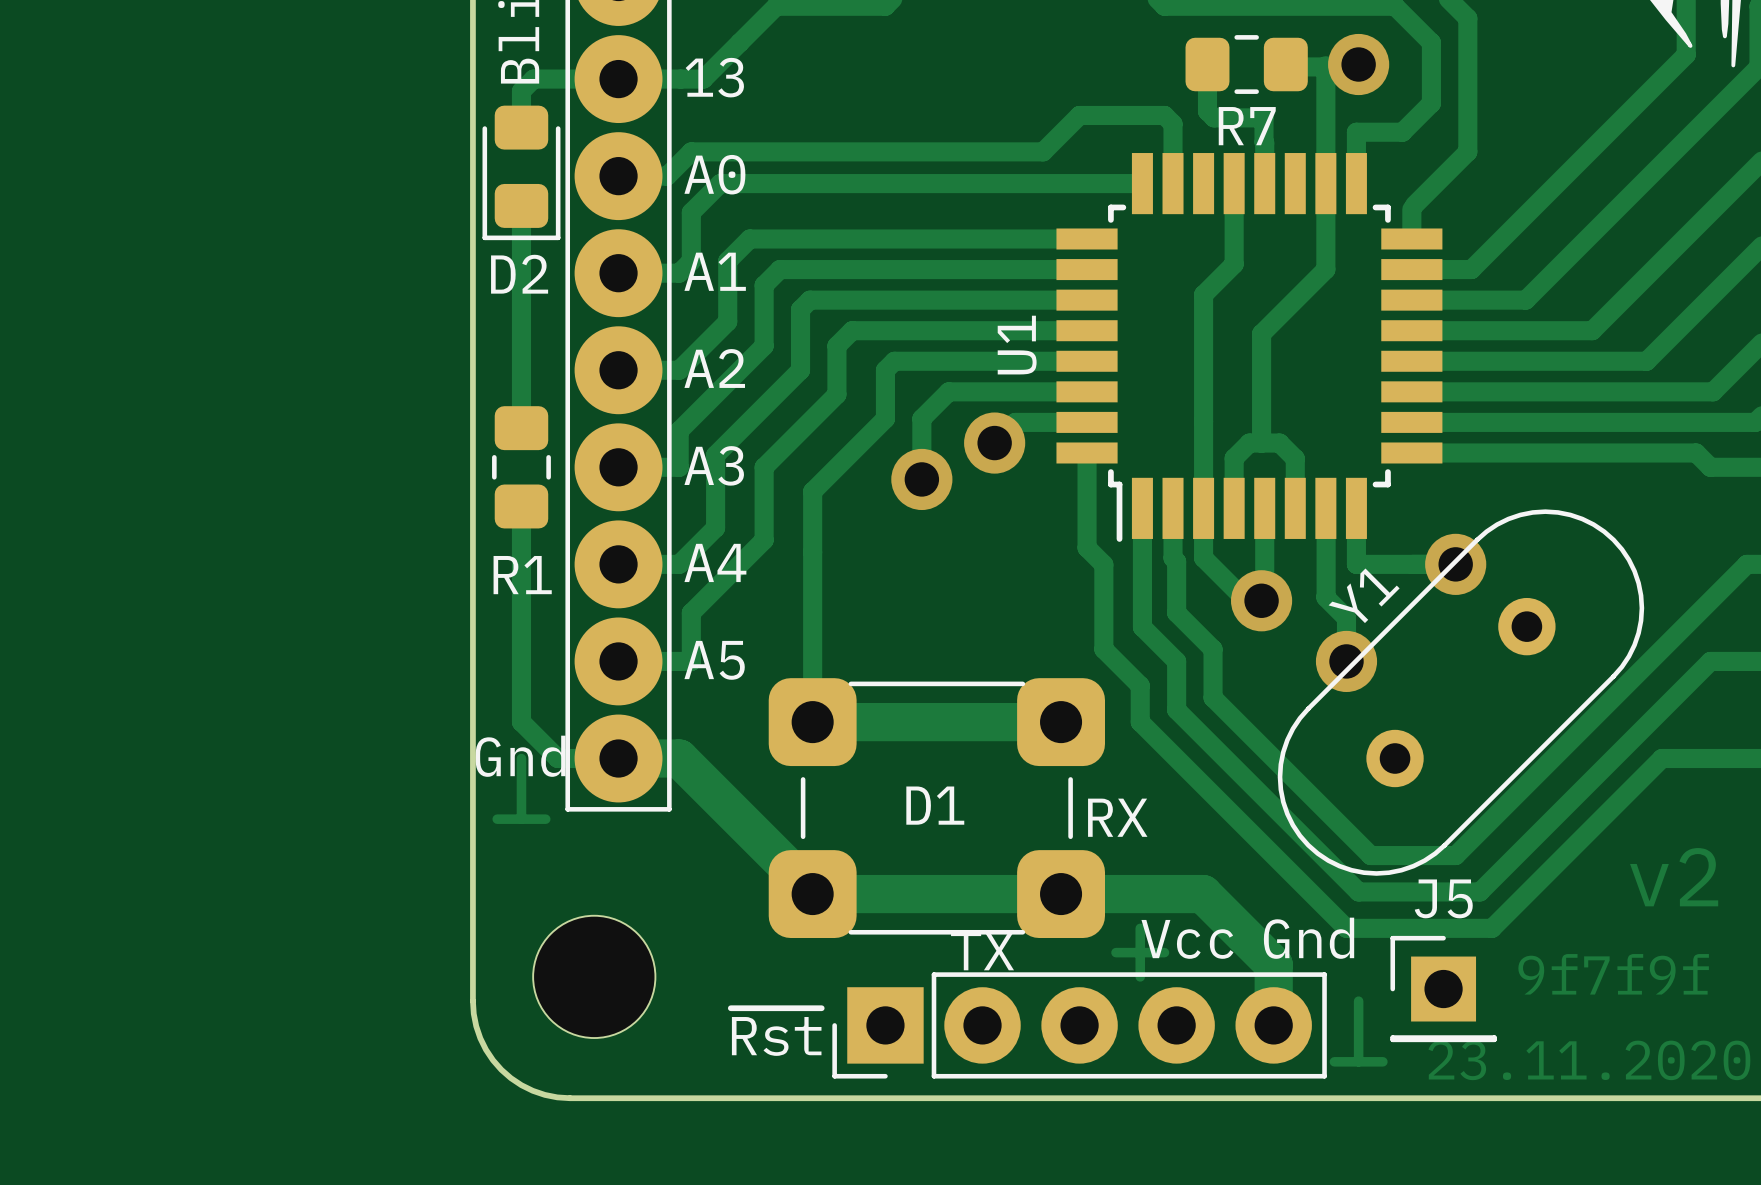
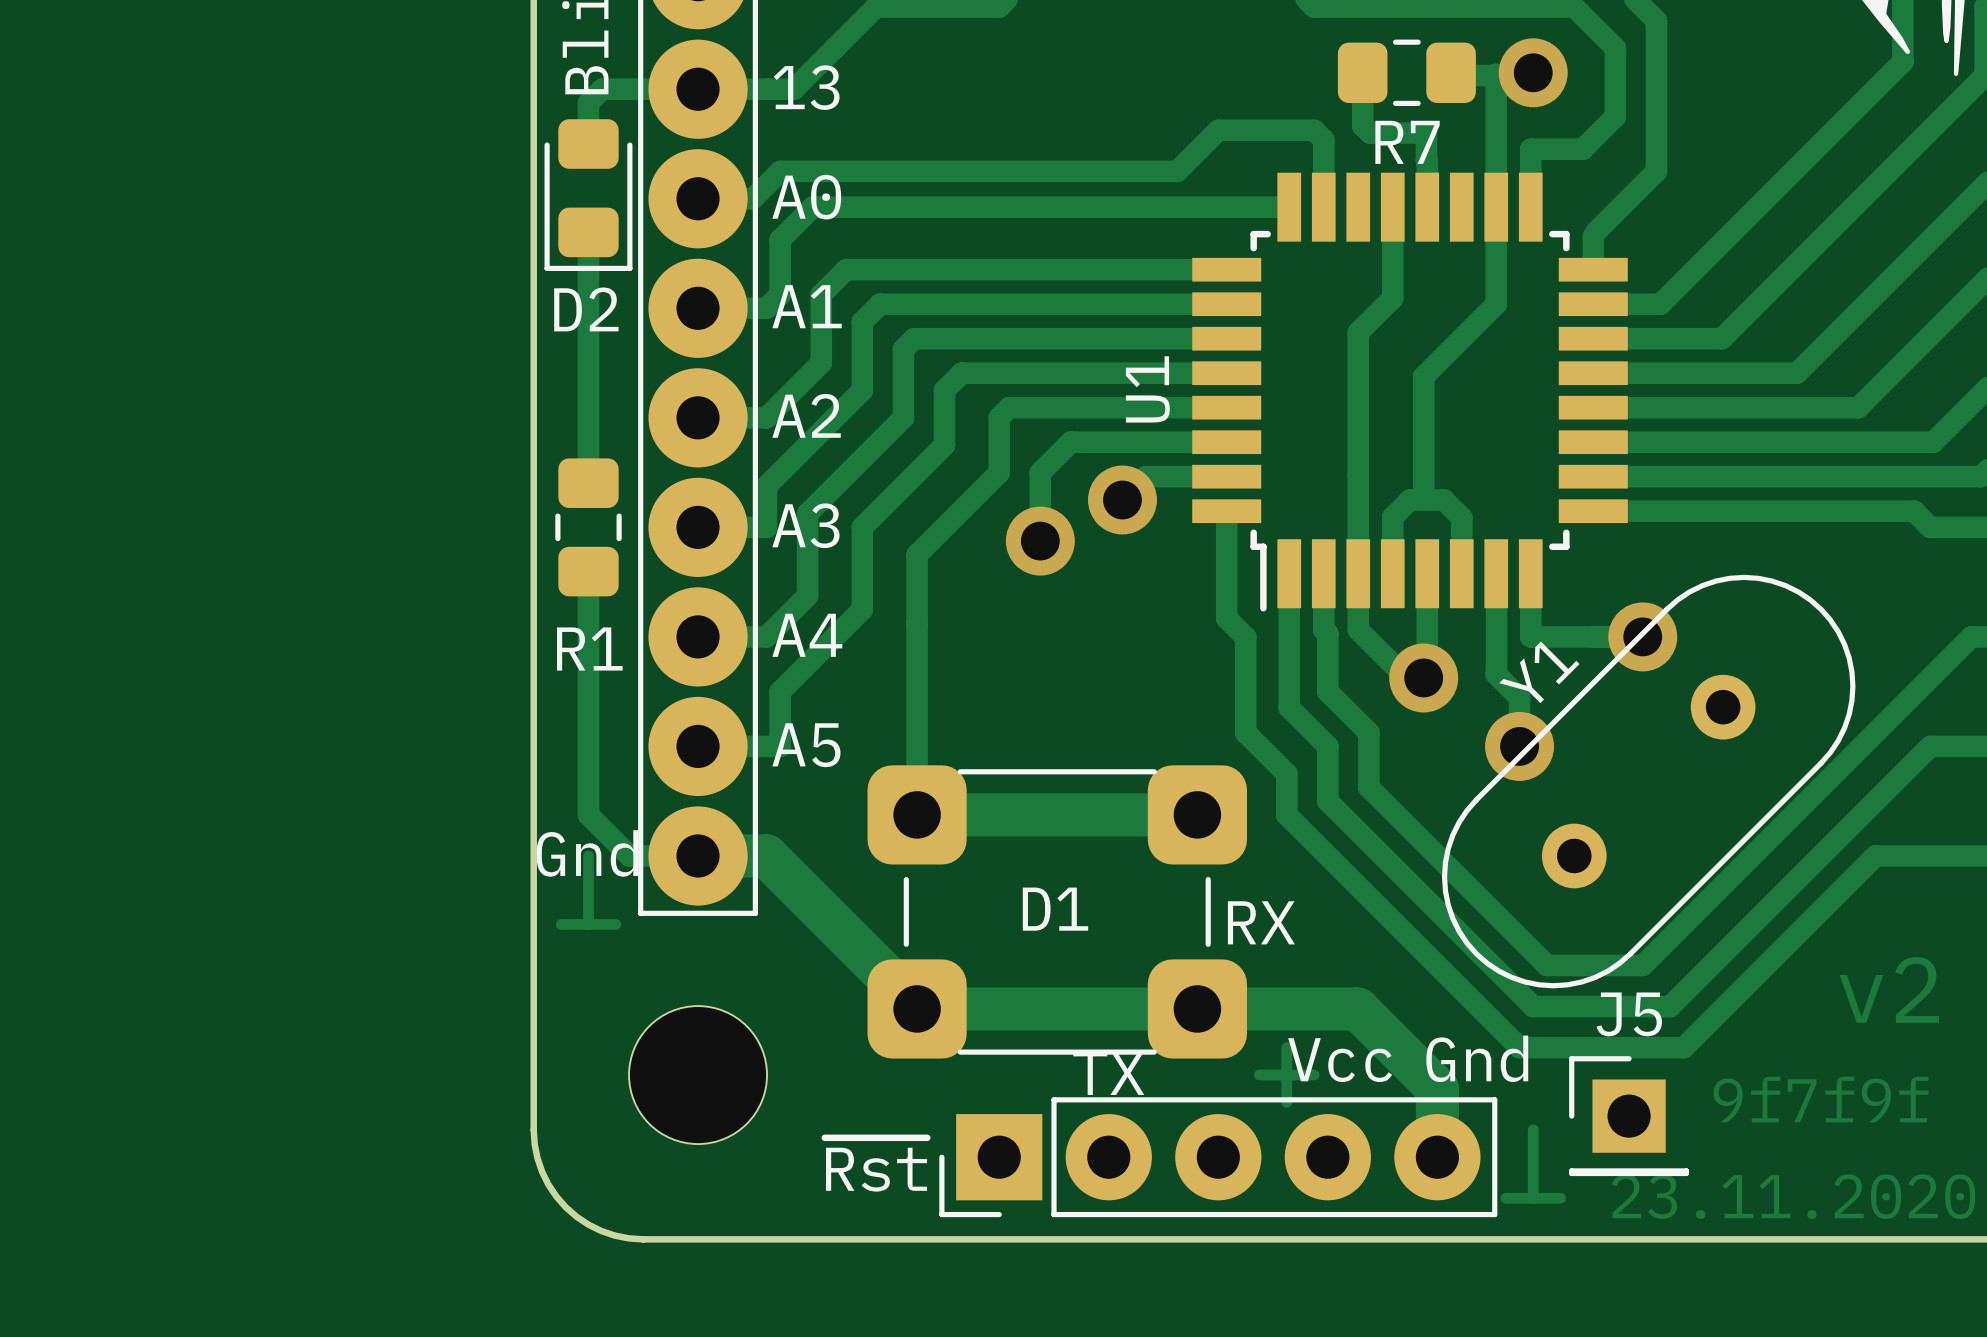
part position: (594, 976) -> (698, 1075)

